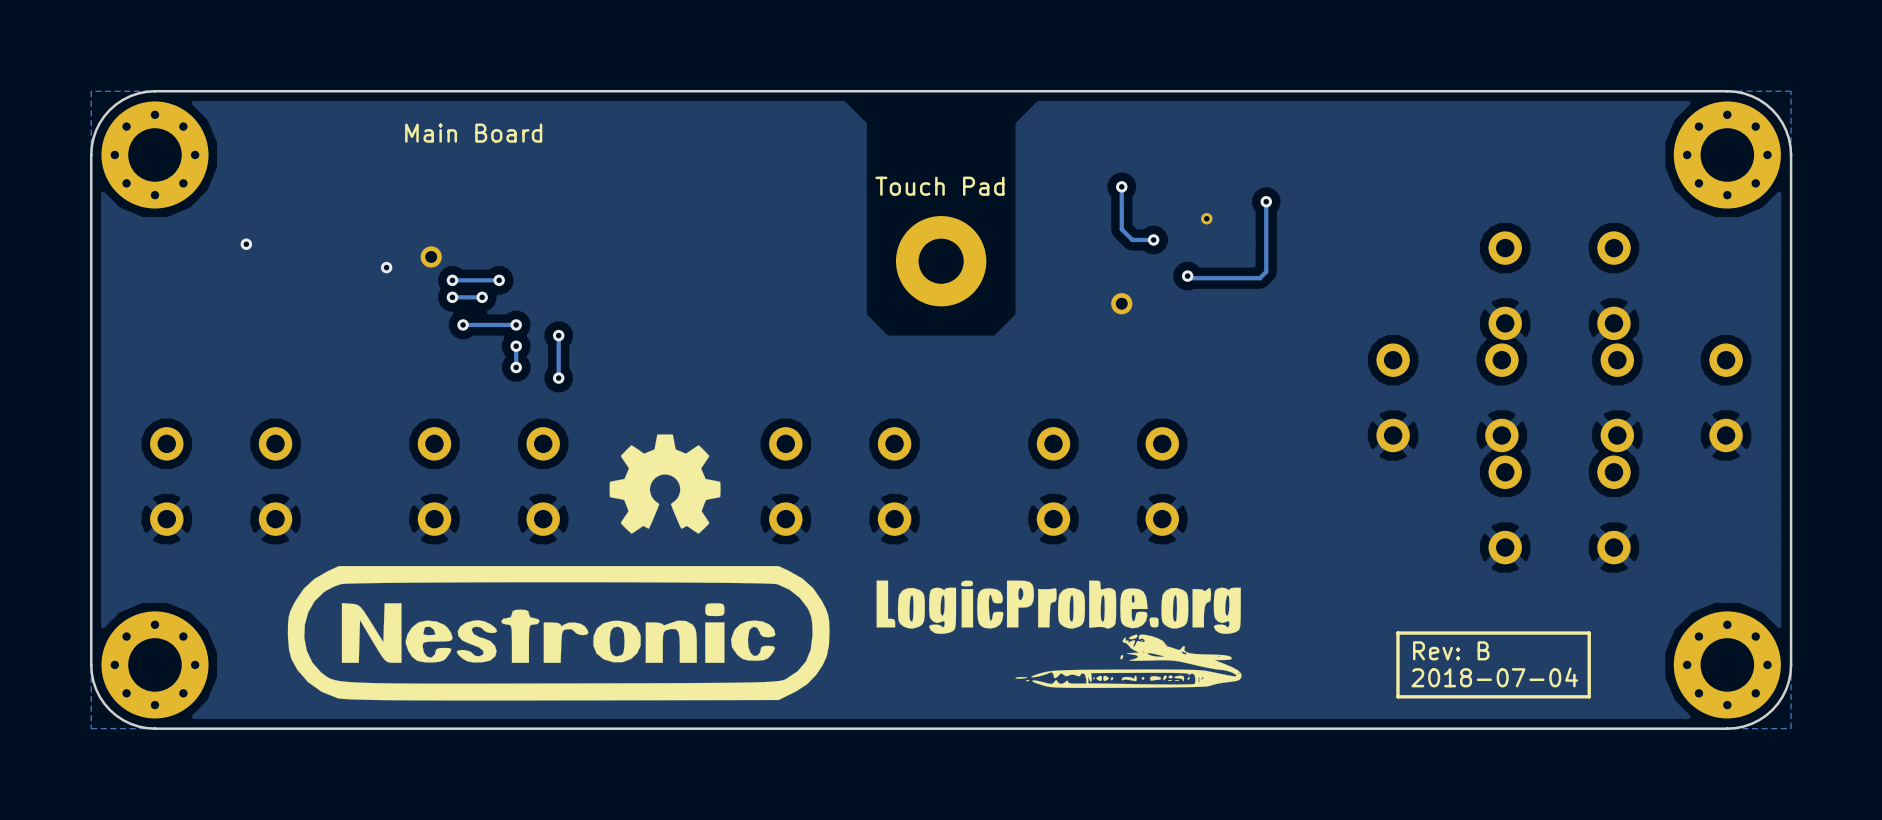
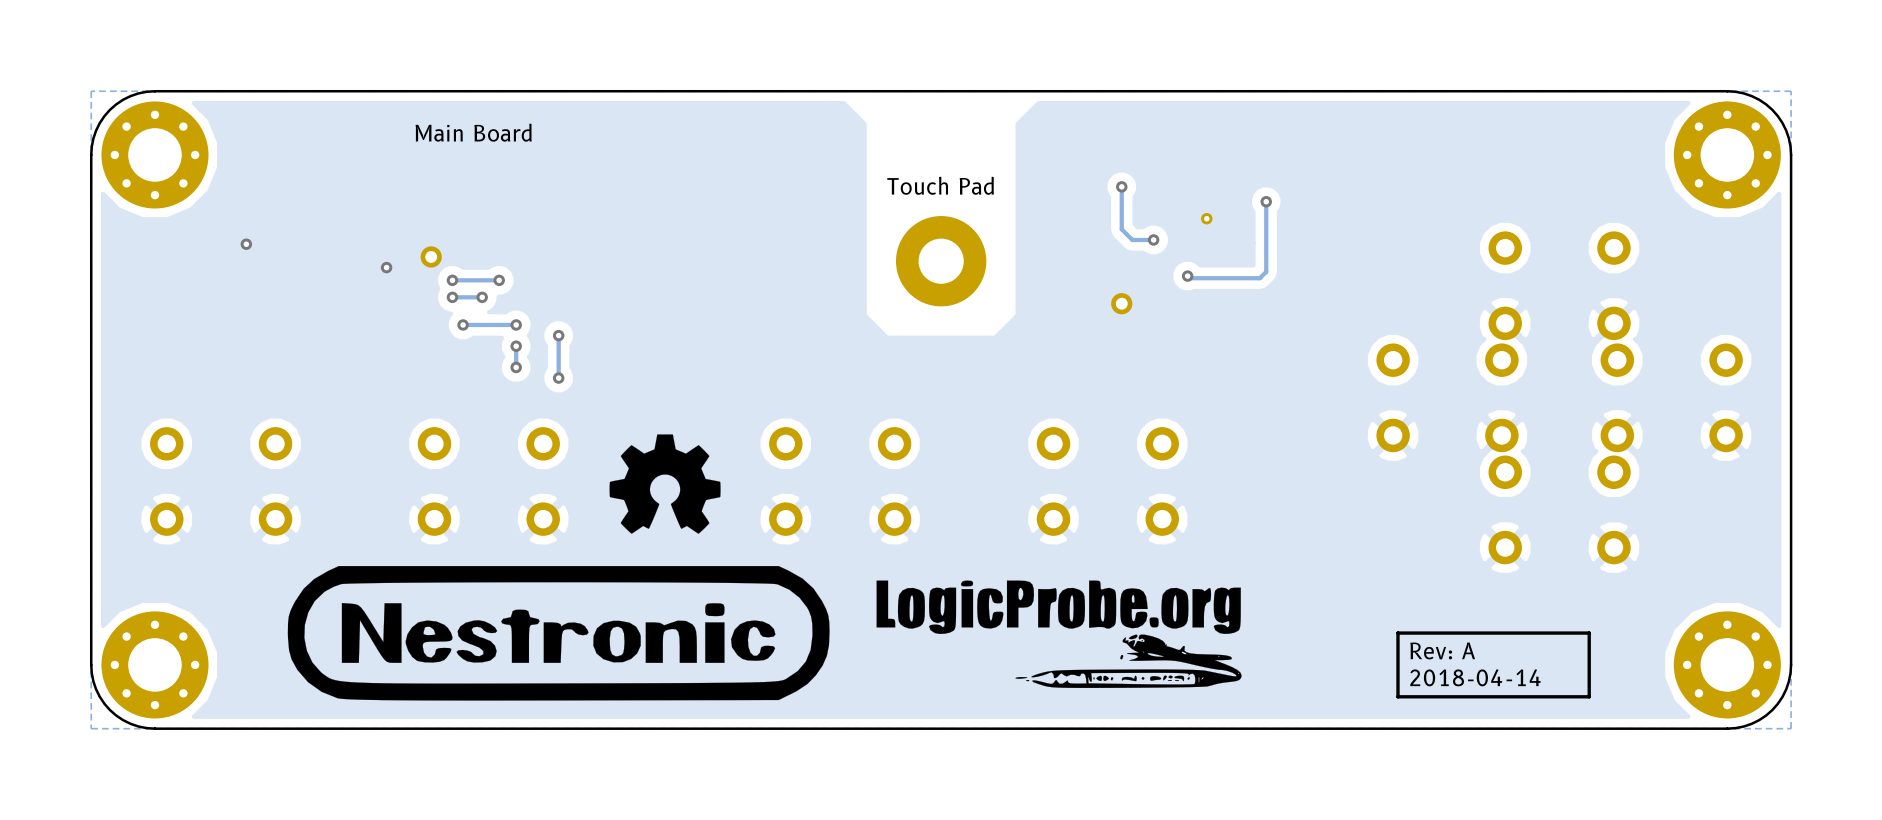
text: Rev: B (1451, 650) -> Rev: A (1442, 650)
text: 2018-07-04 (1494, 677) -> 2018-04-14 (1475, 677)

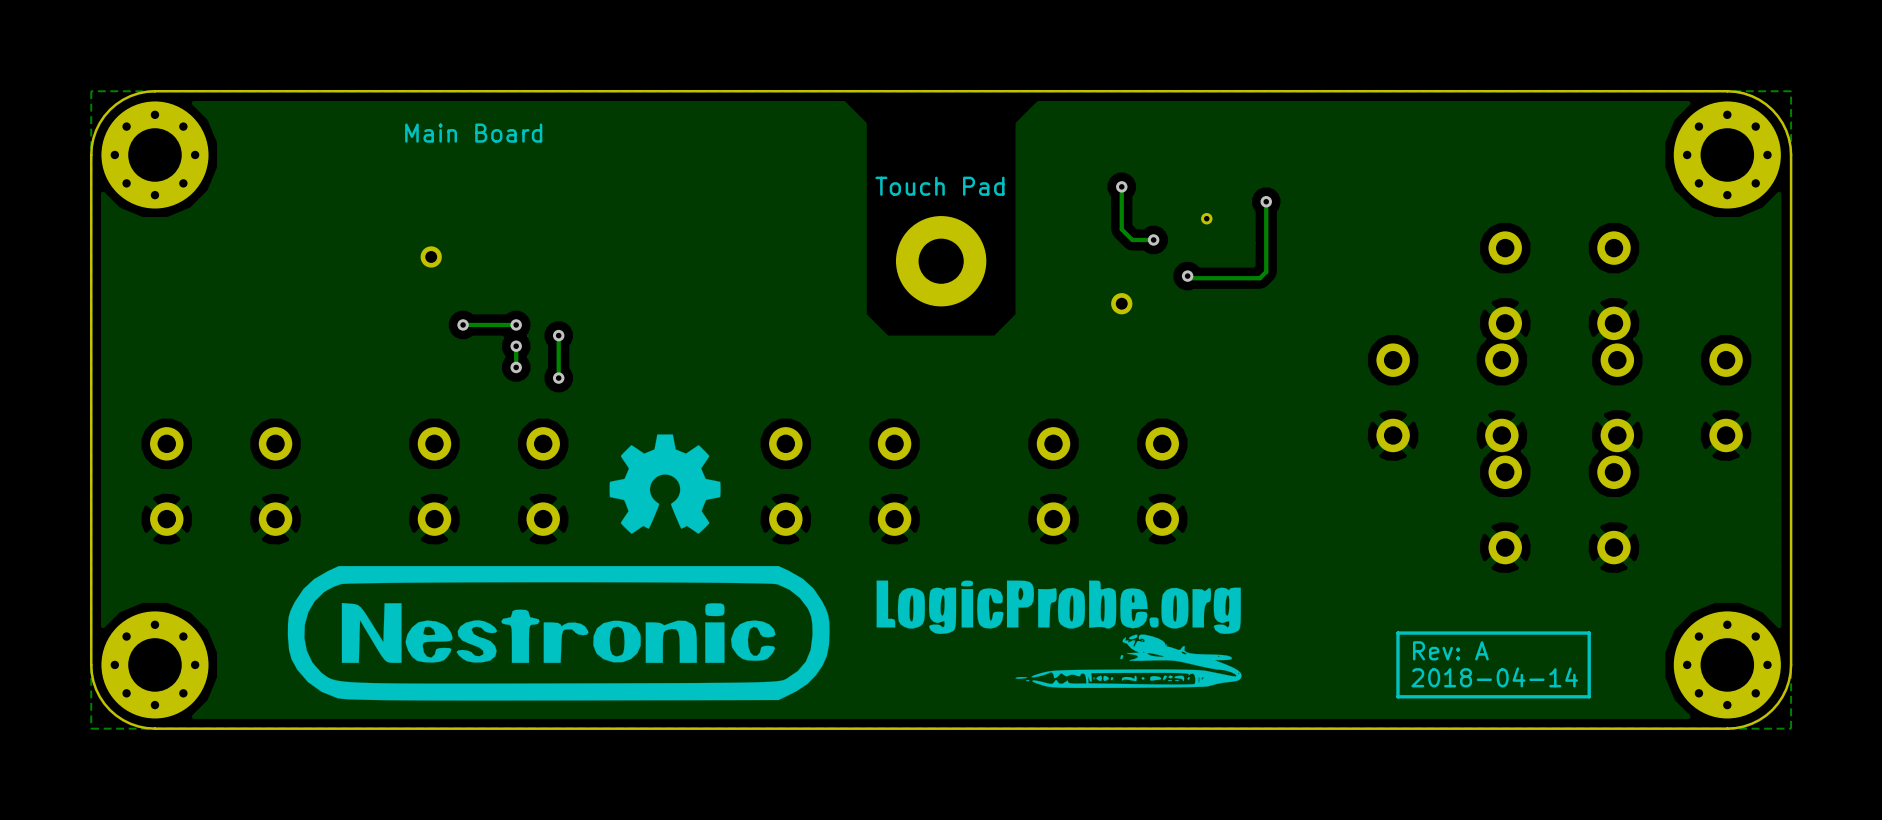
via: (246, 244) -> none
via: (386, 267) -> none
via: (452, 280) -> none
track: (499, 280) (452, 280) -> none
via: (499, 280) -> none
via: (452, 297) -> none
track: (482, 297) (452, 297) -> none
via: (482, 297) -> none

